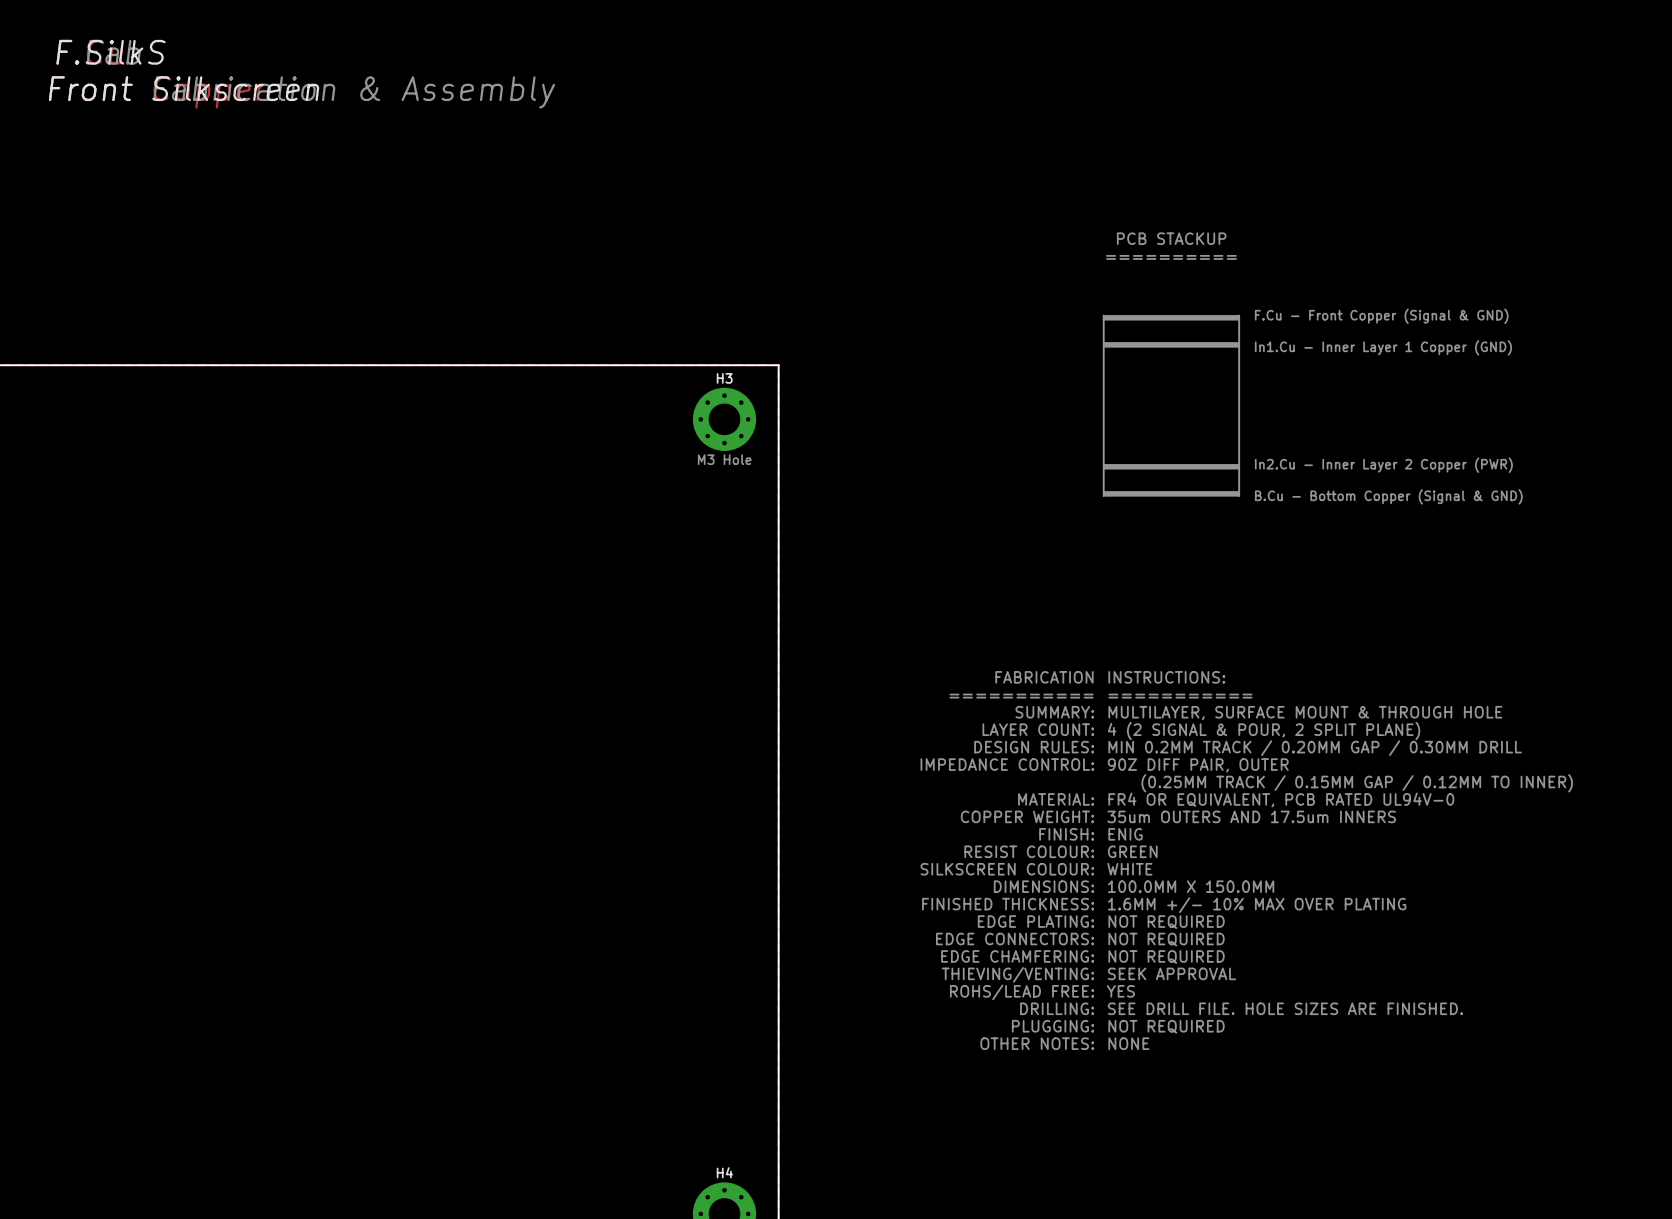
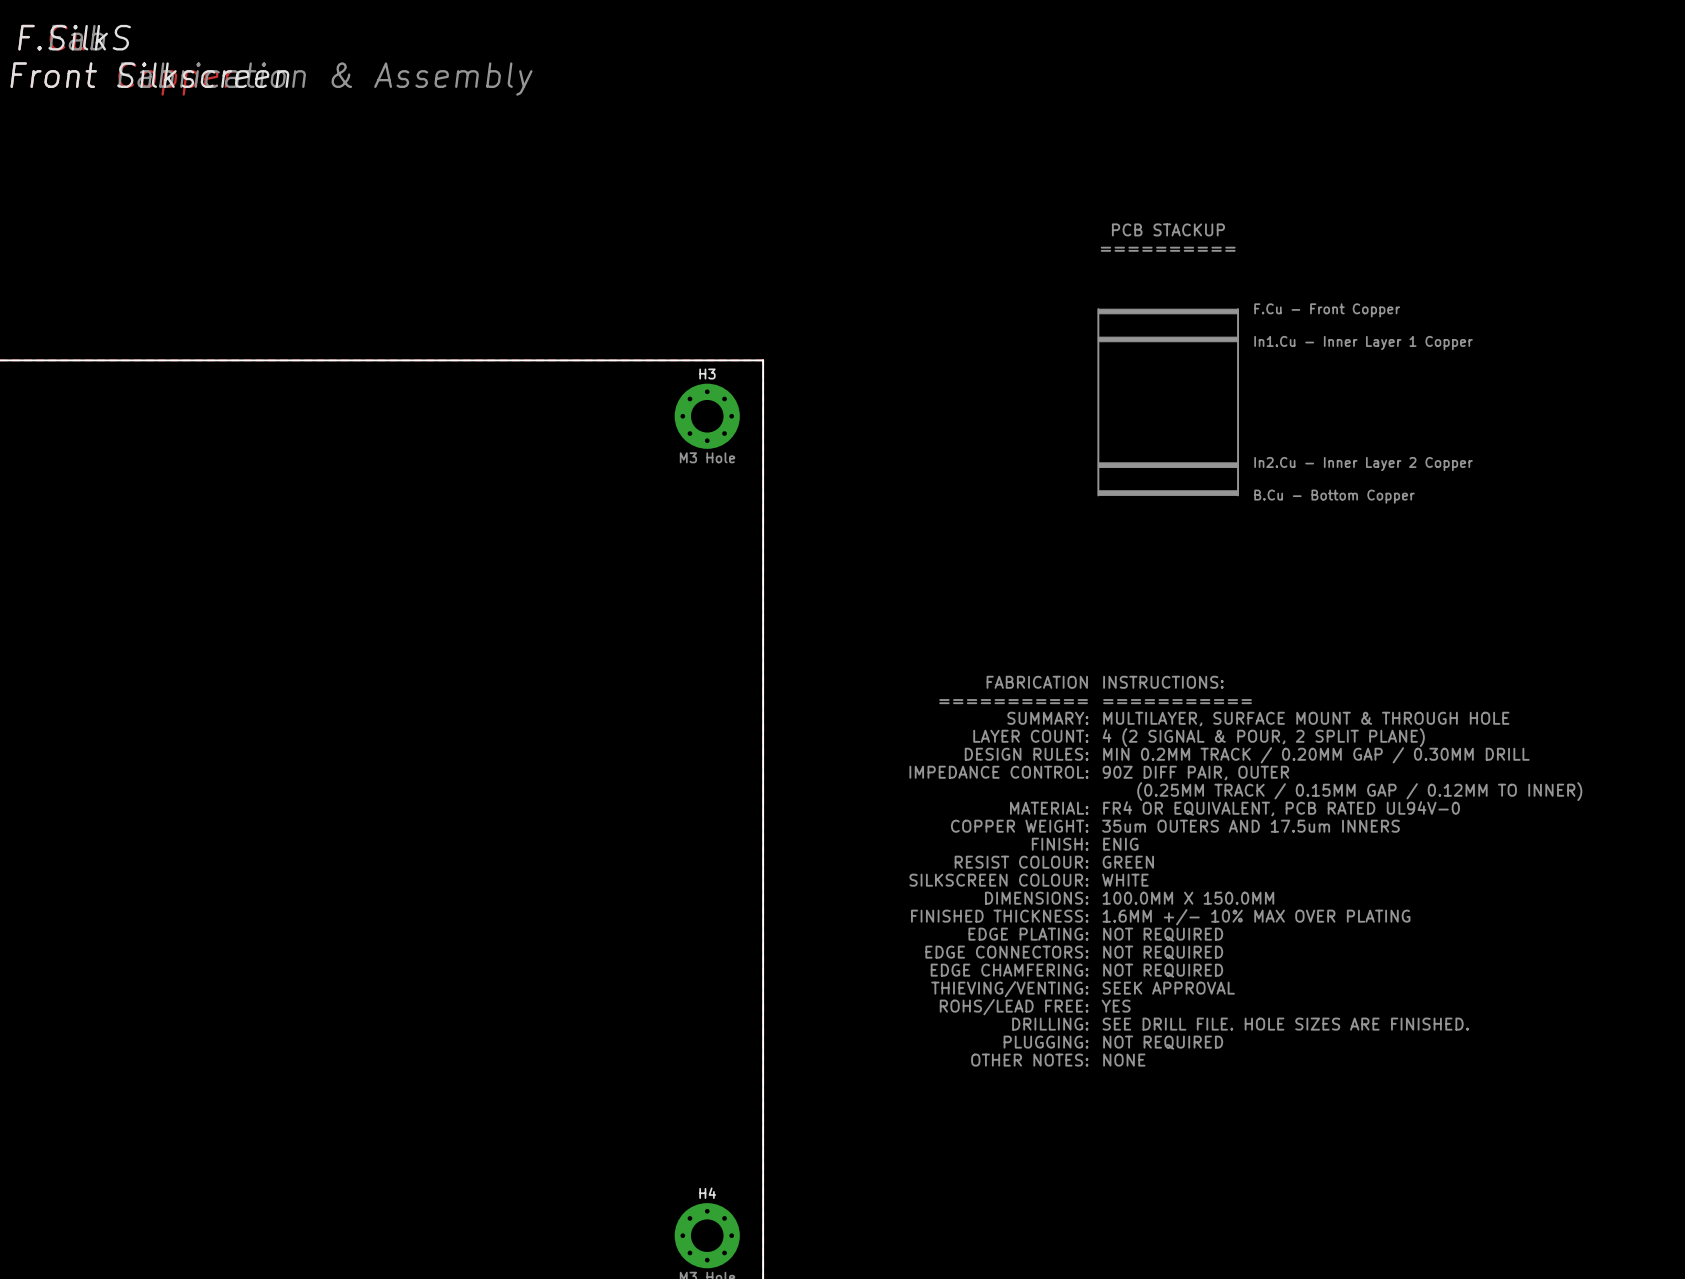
text: F.Cu - Front Copper (Signal & GND) (1381, 316) -> F.Cu - Front Copper (1327, 310)
text: In1.Cu - Inner Layer 1 Copper (GND) (1383, 347) -> In1.Cu - Inner Layer 1 Copper (1363, 342)
text: In2.Cu - Inner Layer 2 Copper (PWR) (1383, 465) -> In2.Cu - Inner Layer 2 Copper (1363, 464)
text: B.Cu - Bottom Copper (Signal & GND) (1388, 496) -> B.Cu - Bottom Copper (1334, 496)

